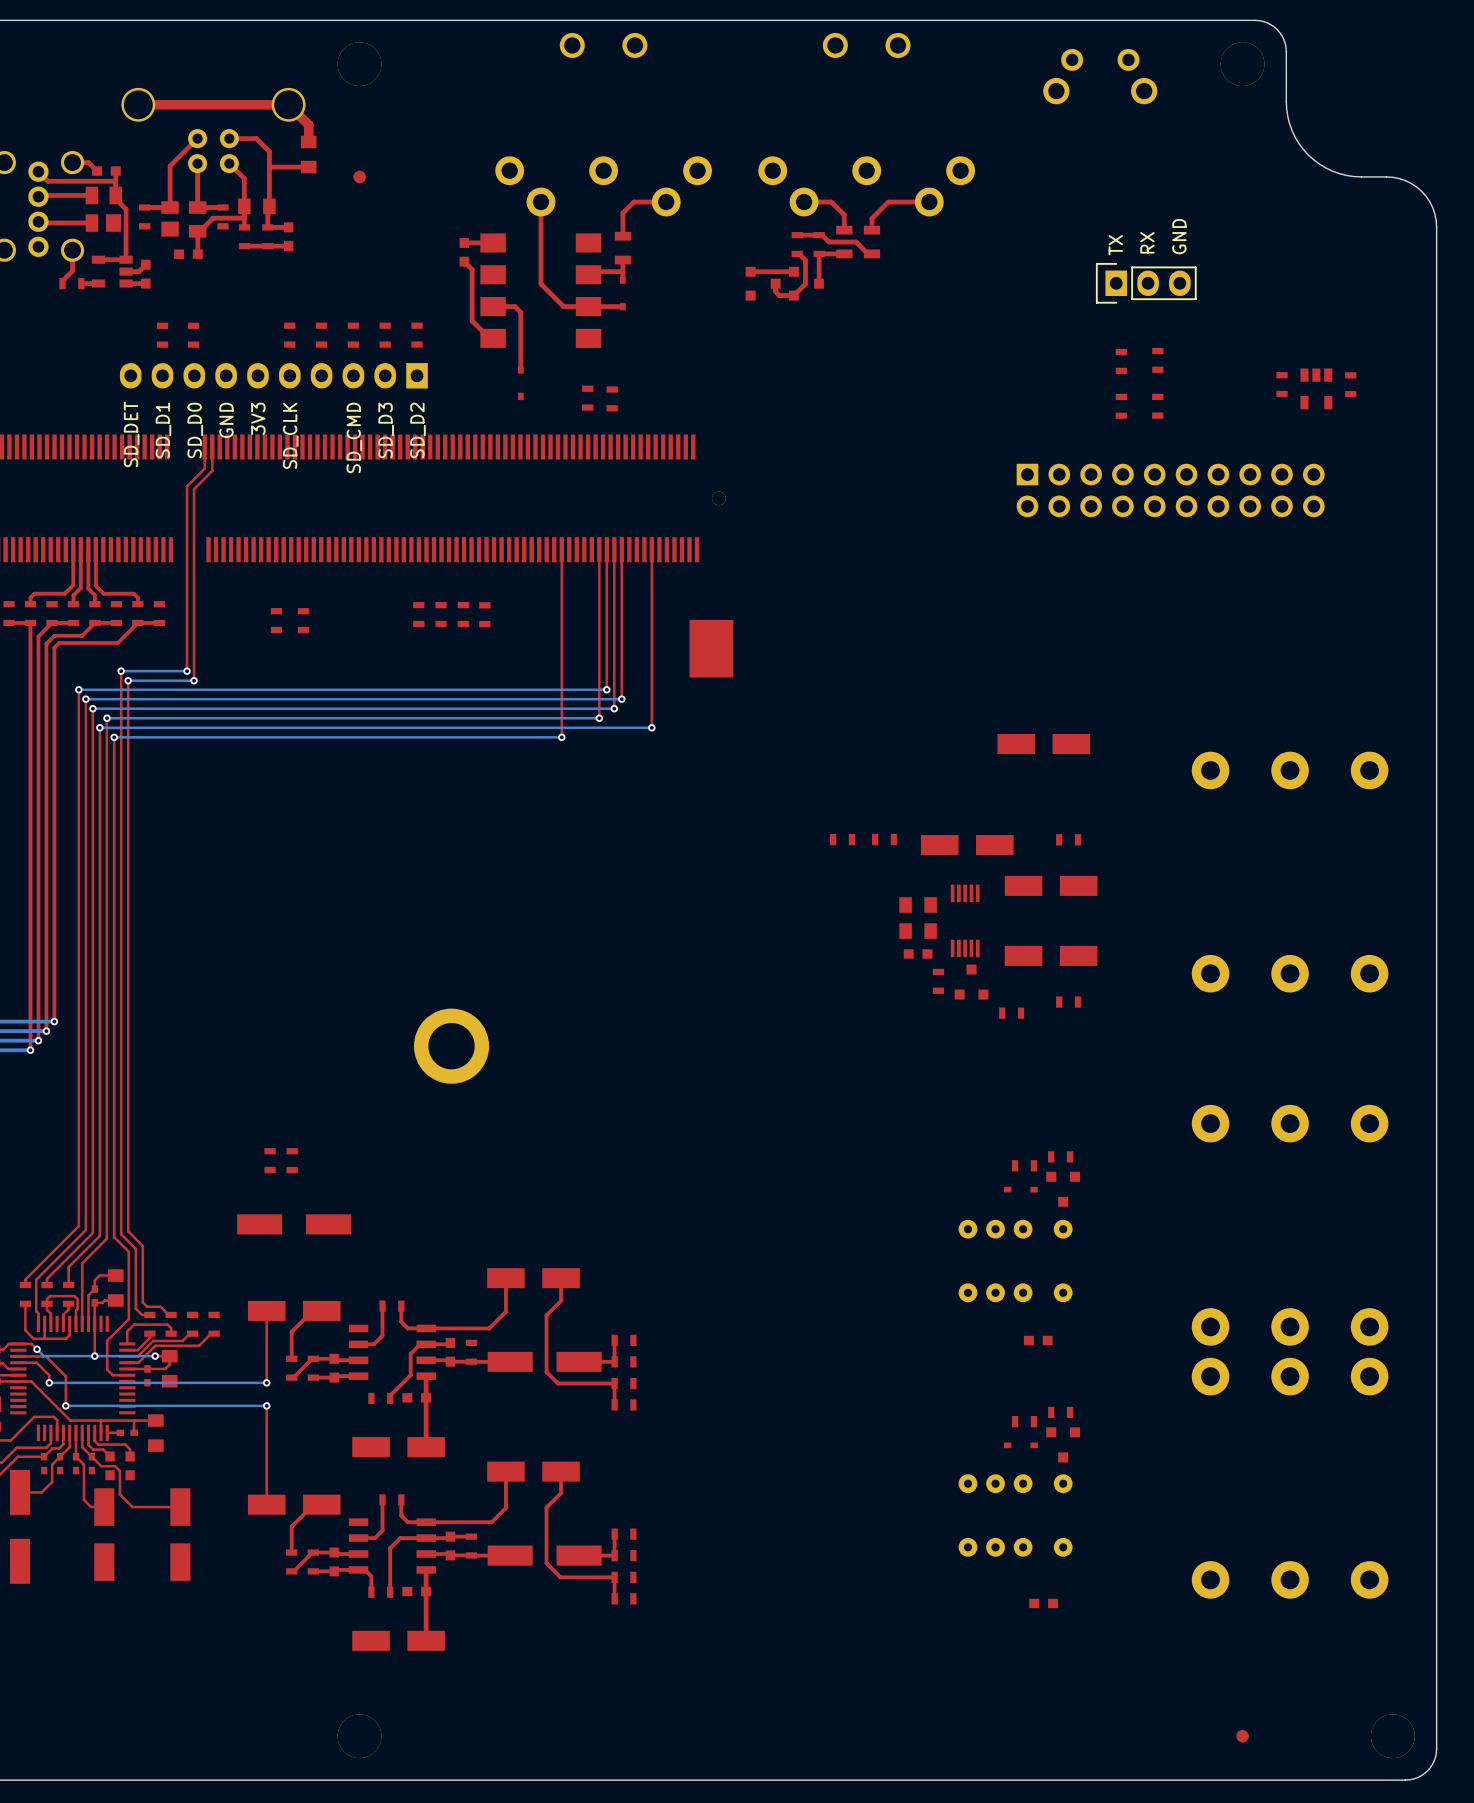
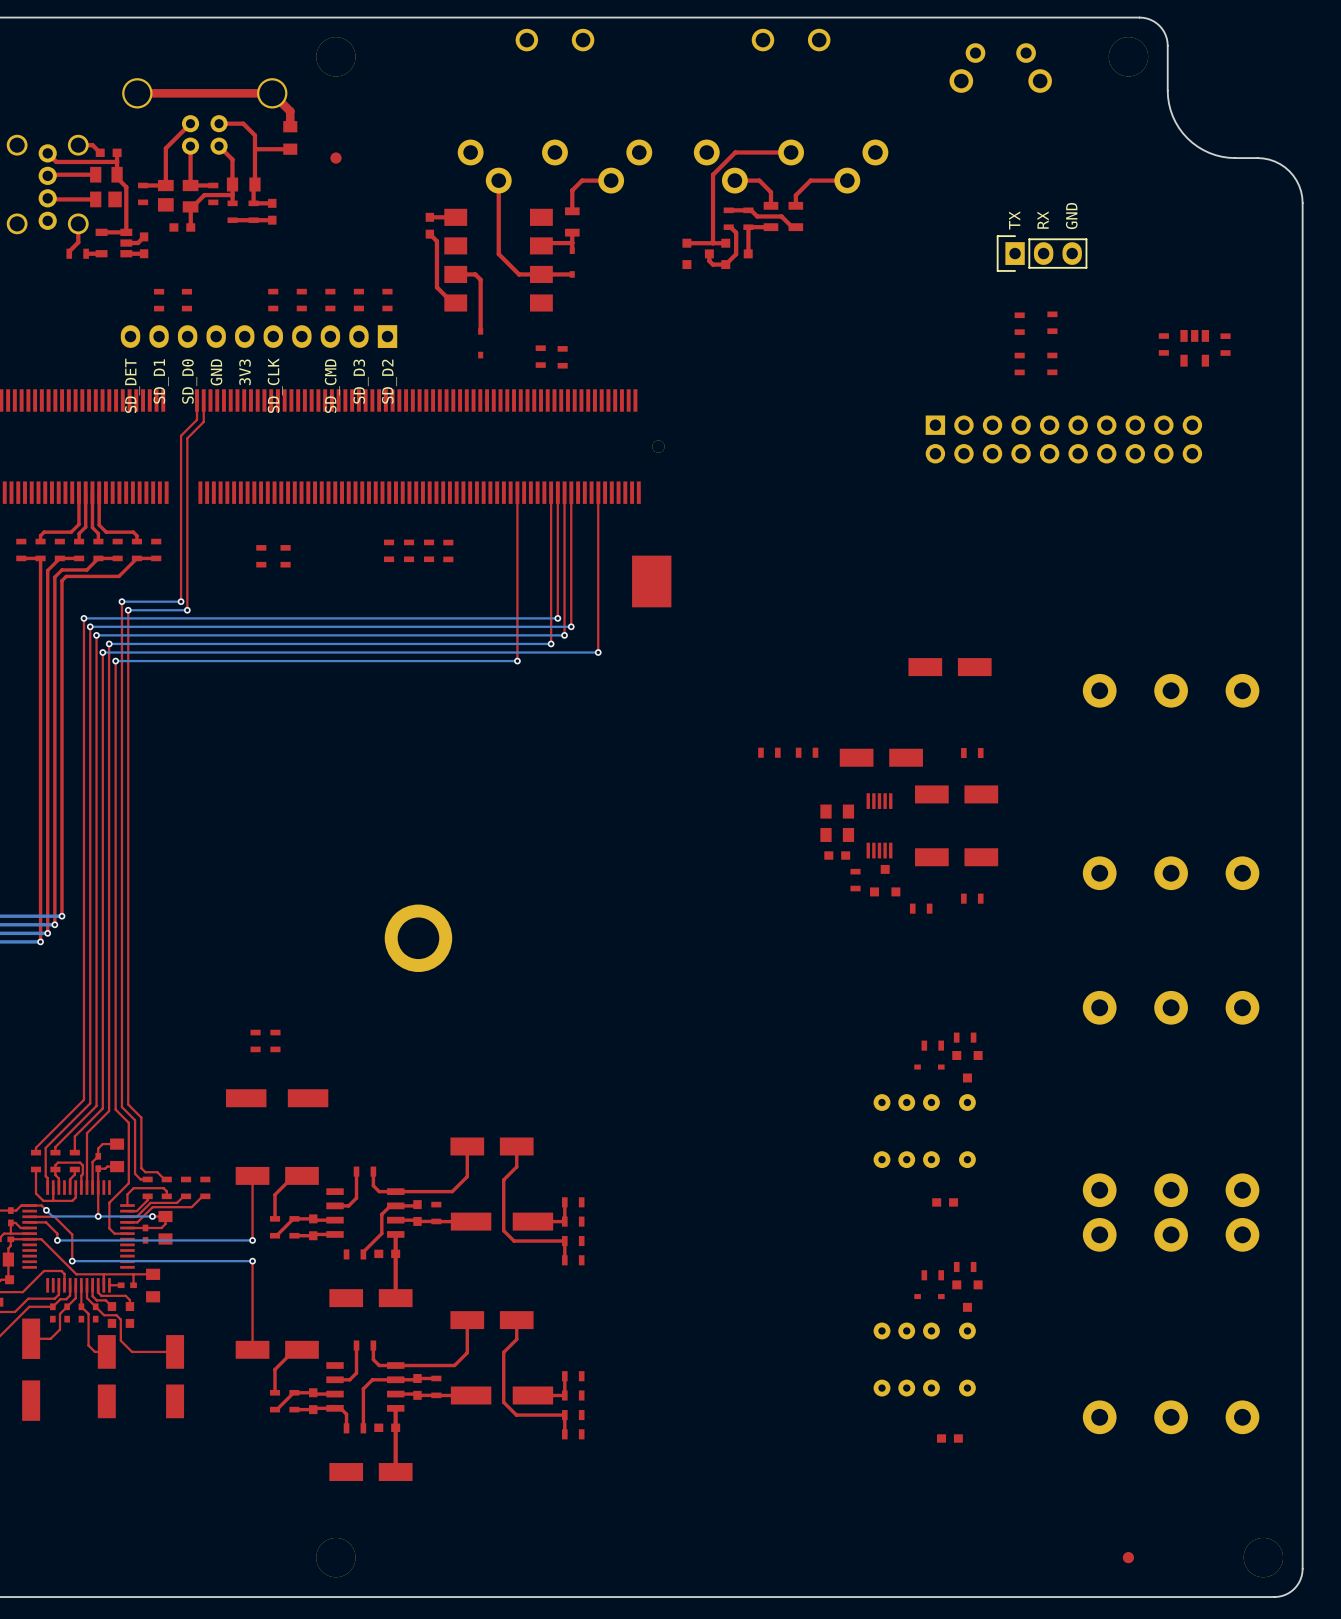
top track: none -> (791, 152) (735, 152) (713, 174) (713, 243)

